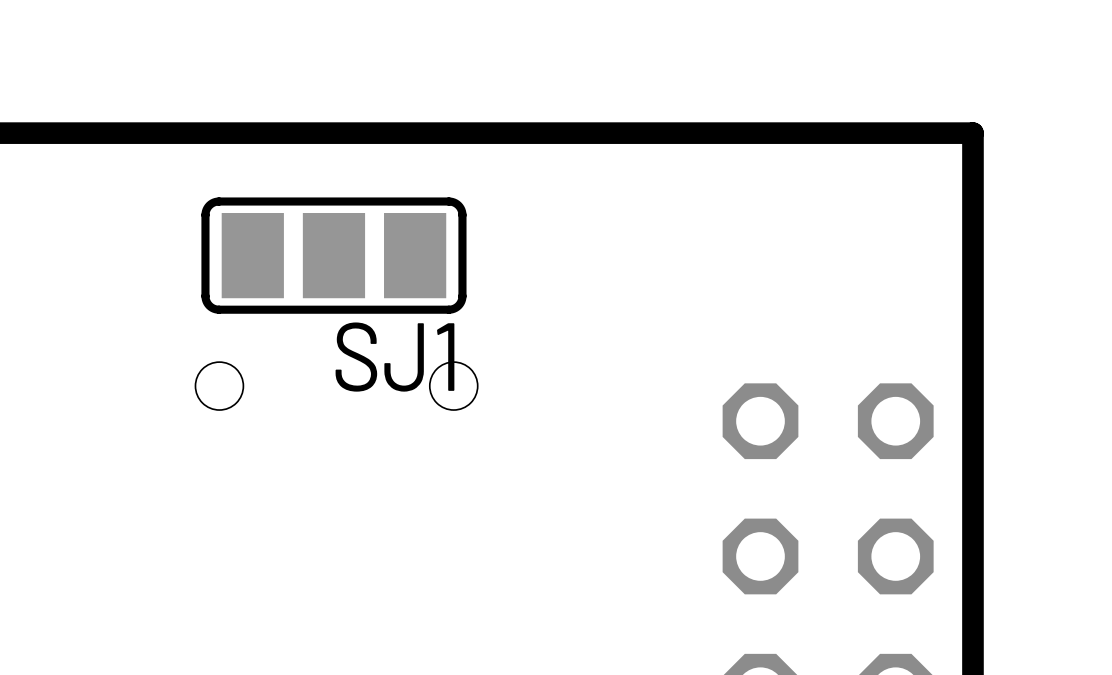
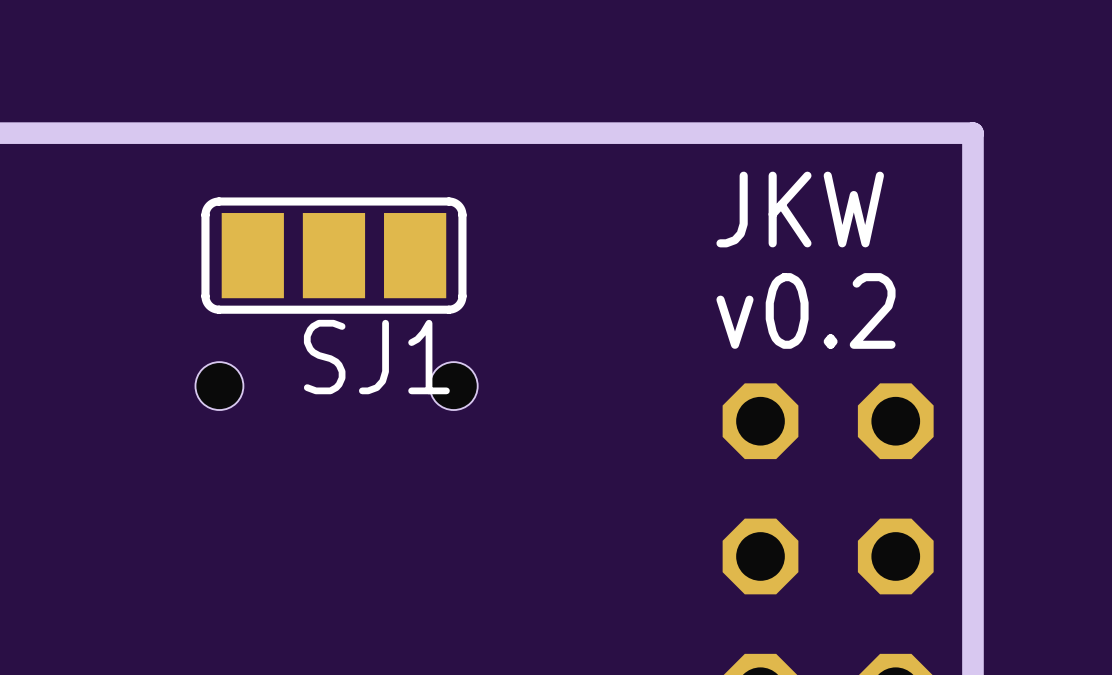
text: none -> JKW (800, 209)
text: none -> v0.2 (805, 310)

